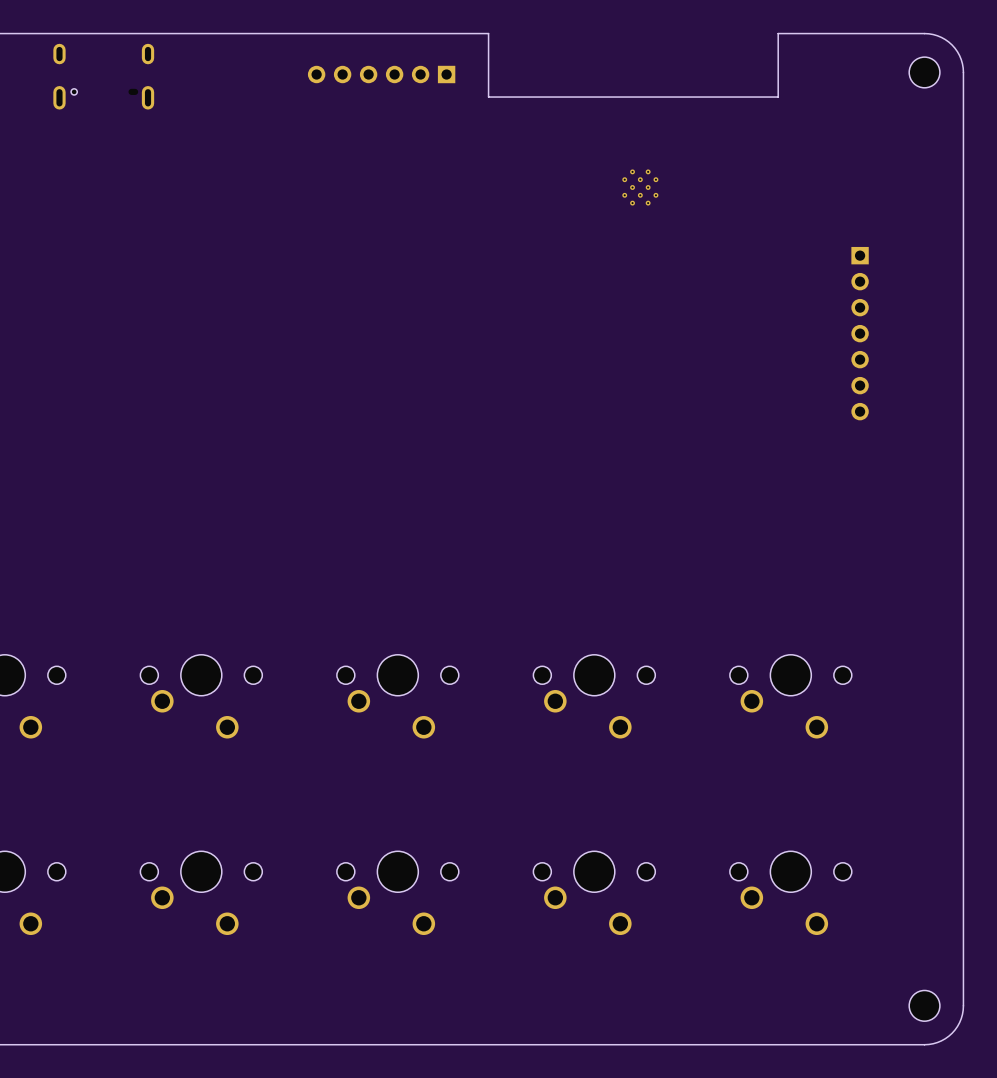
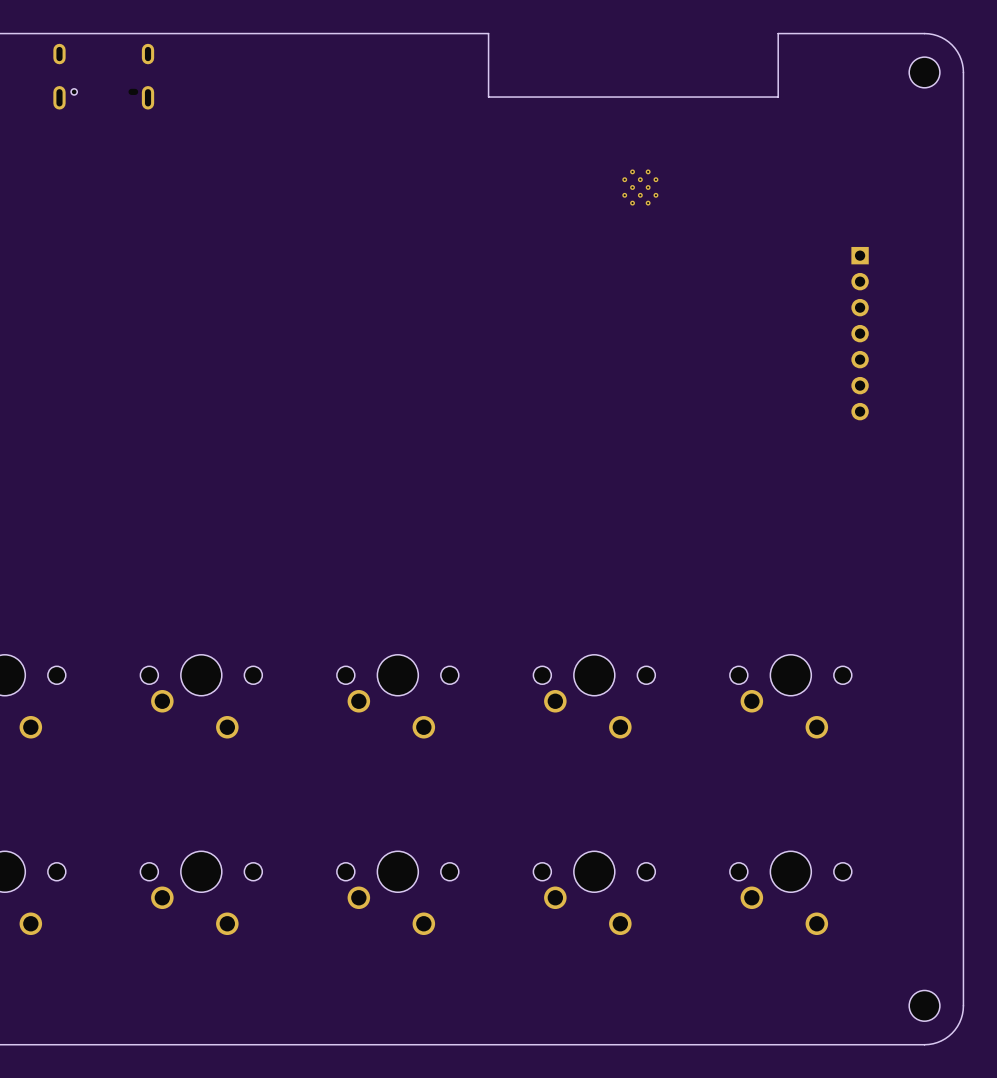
part: (381, 74) -> none

